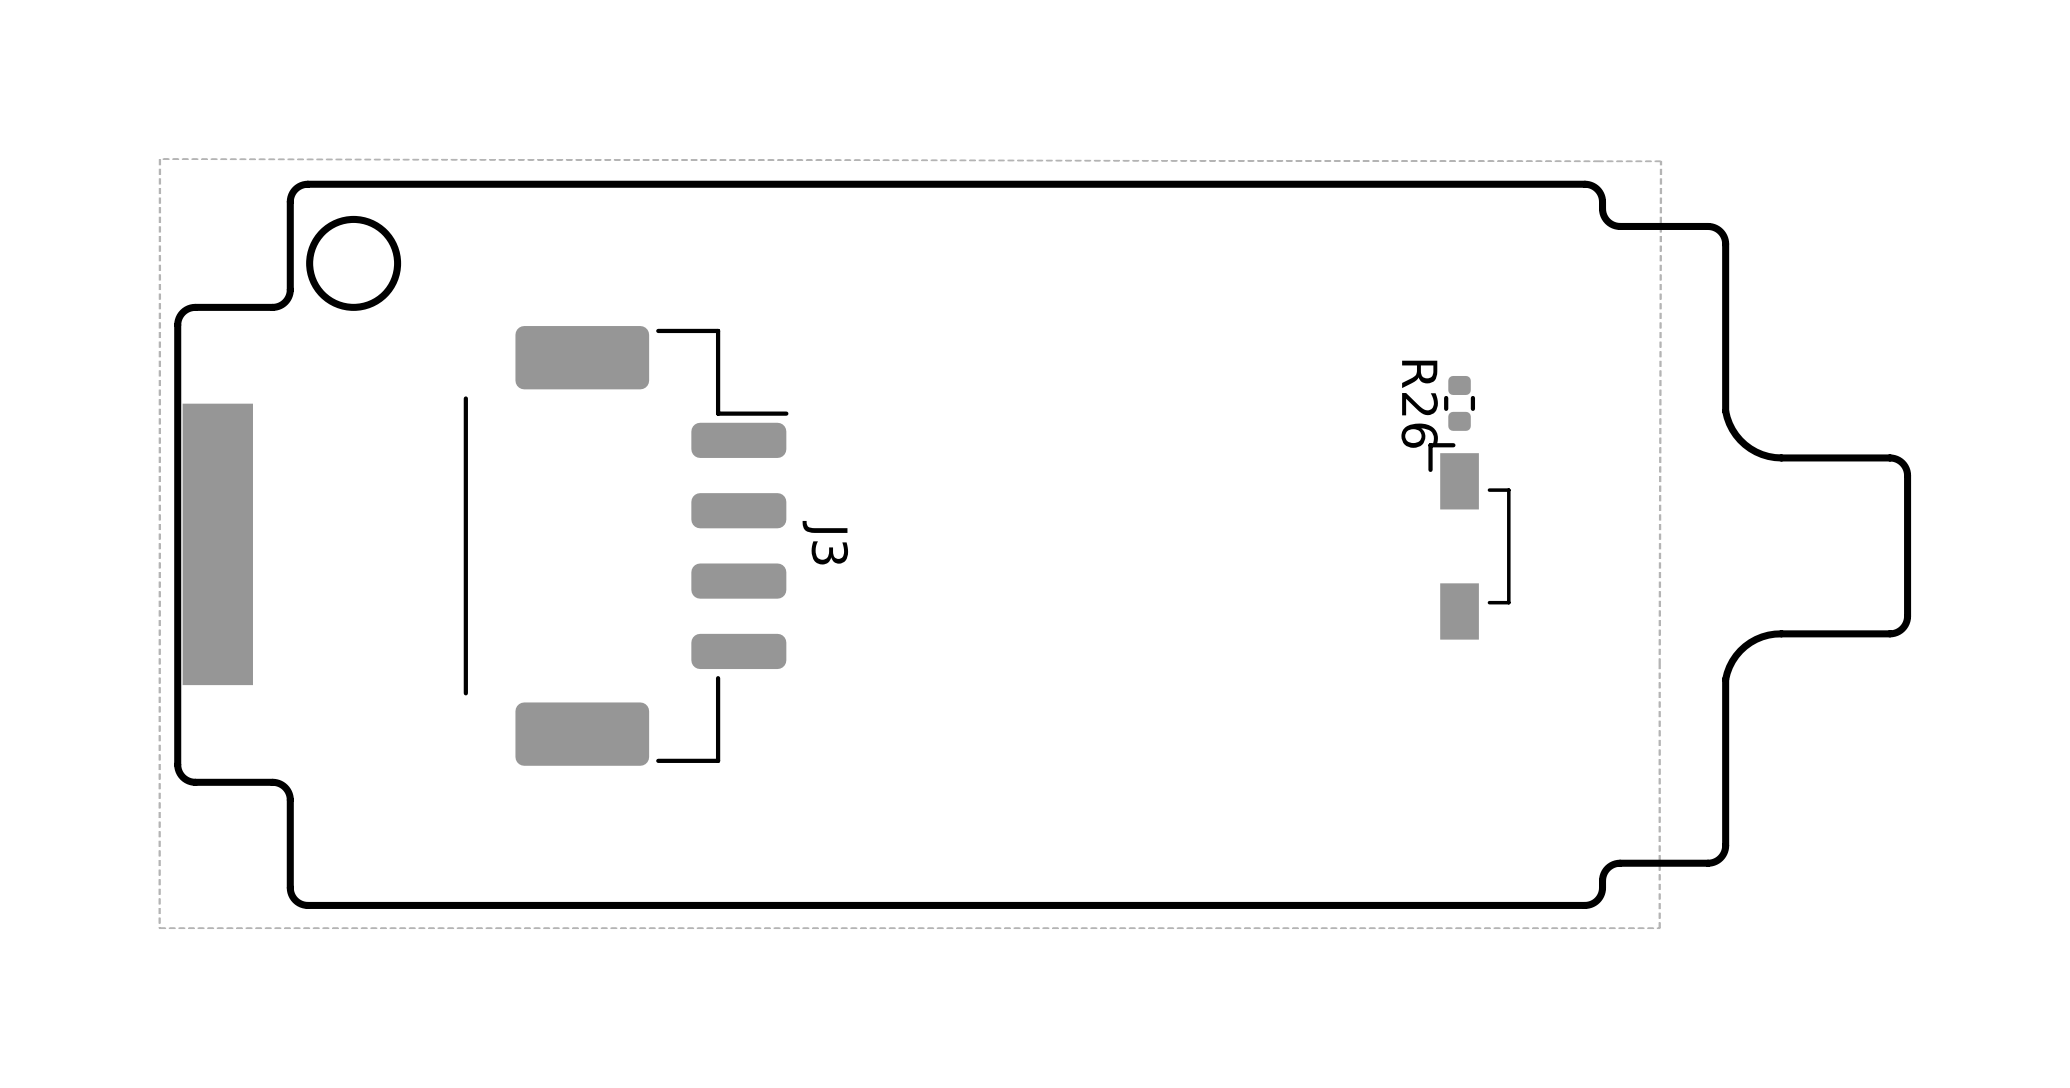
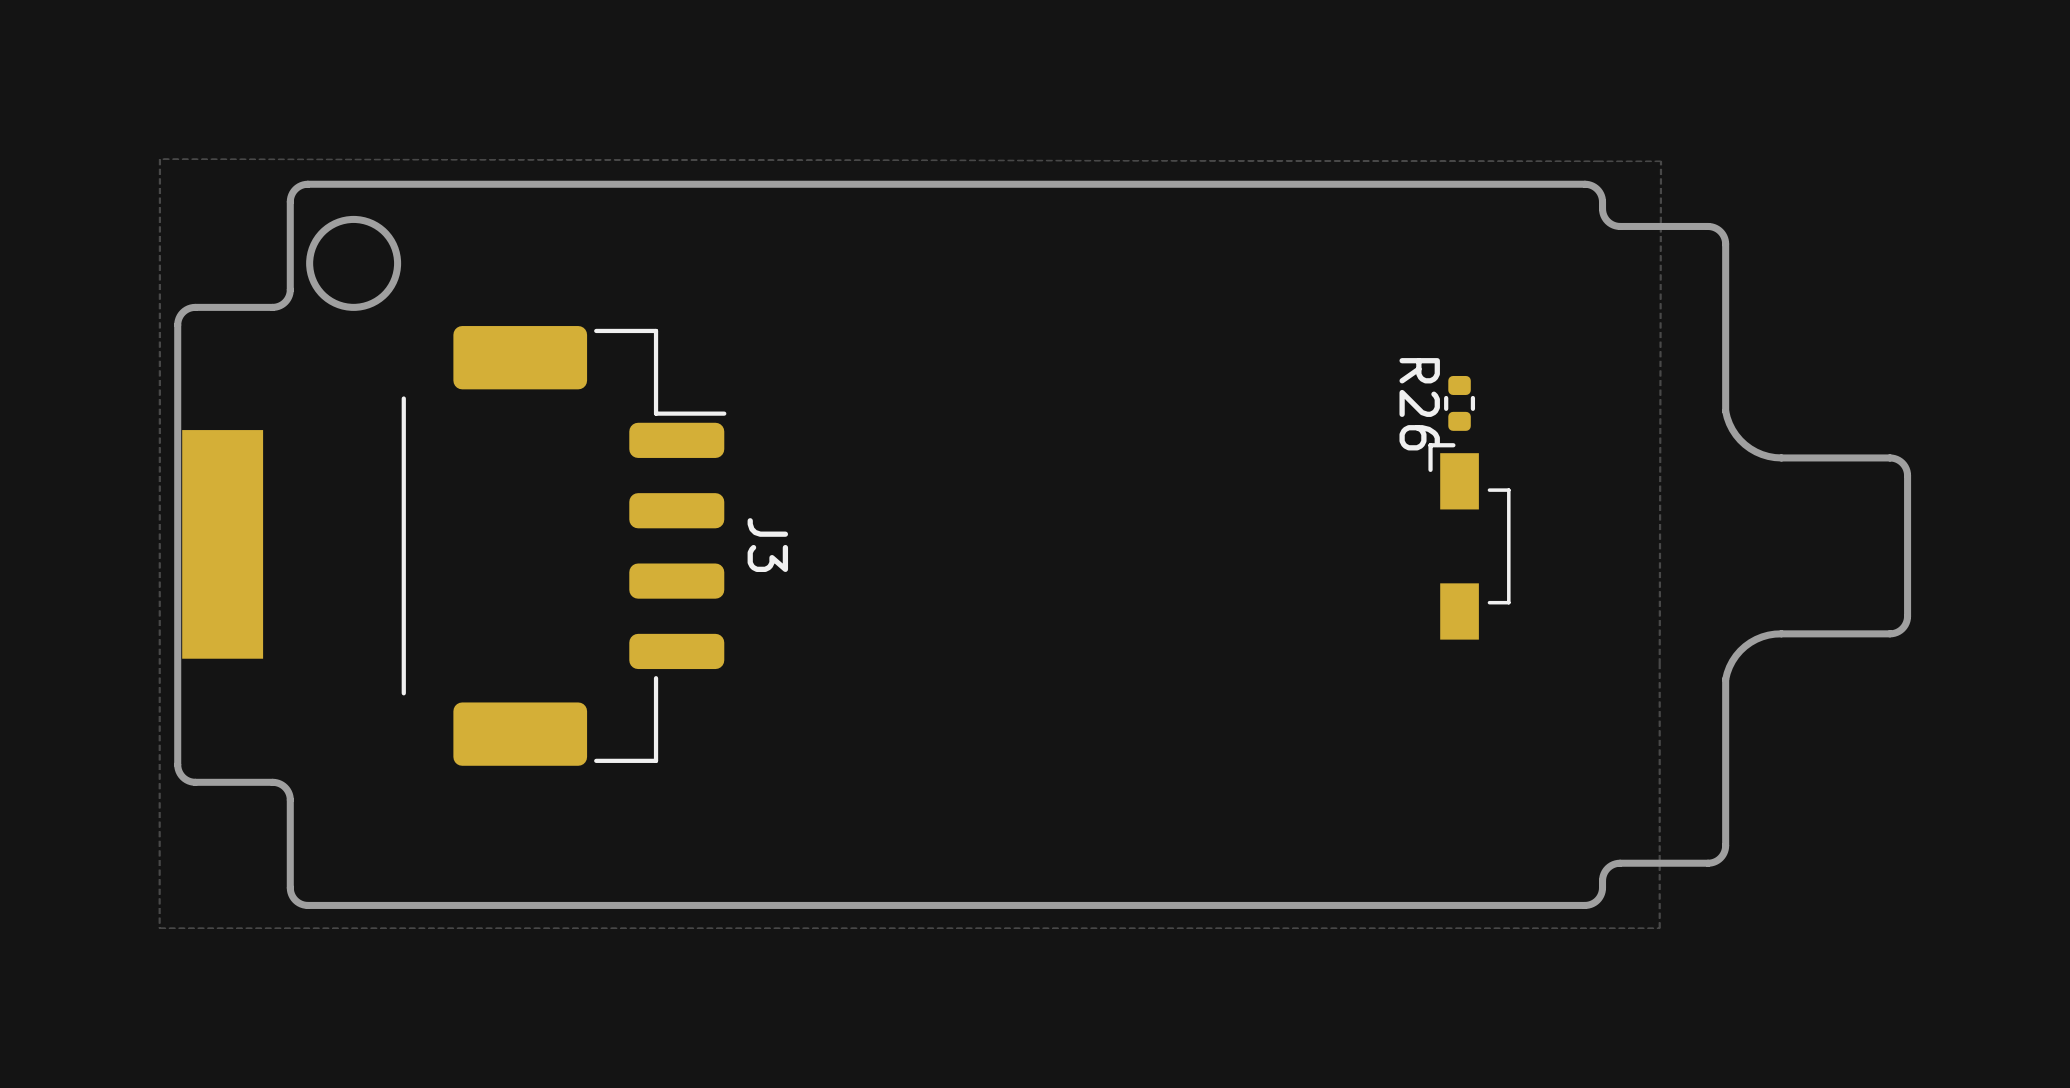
part footprint: [182, 403, 253, 686] -> [182, 430, 264, 659]
J3 position: (626, 545) -> (564, 545)

